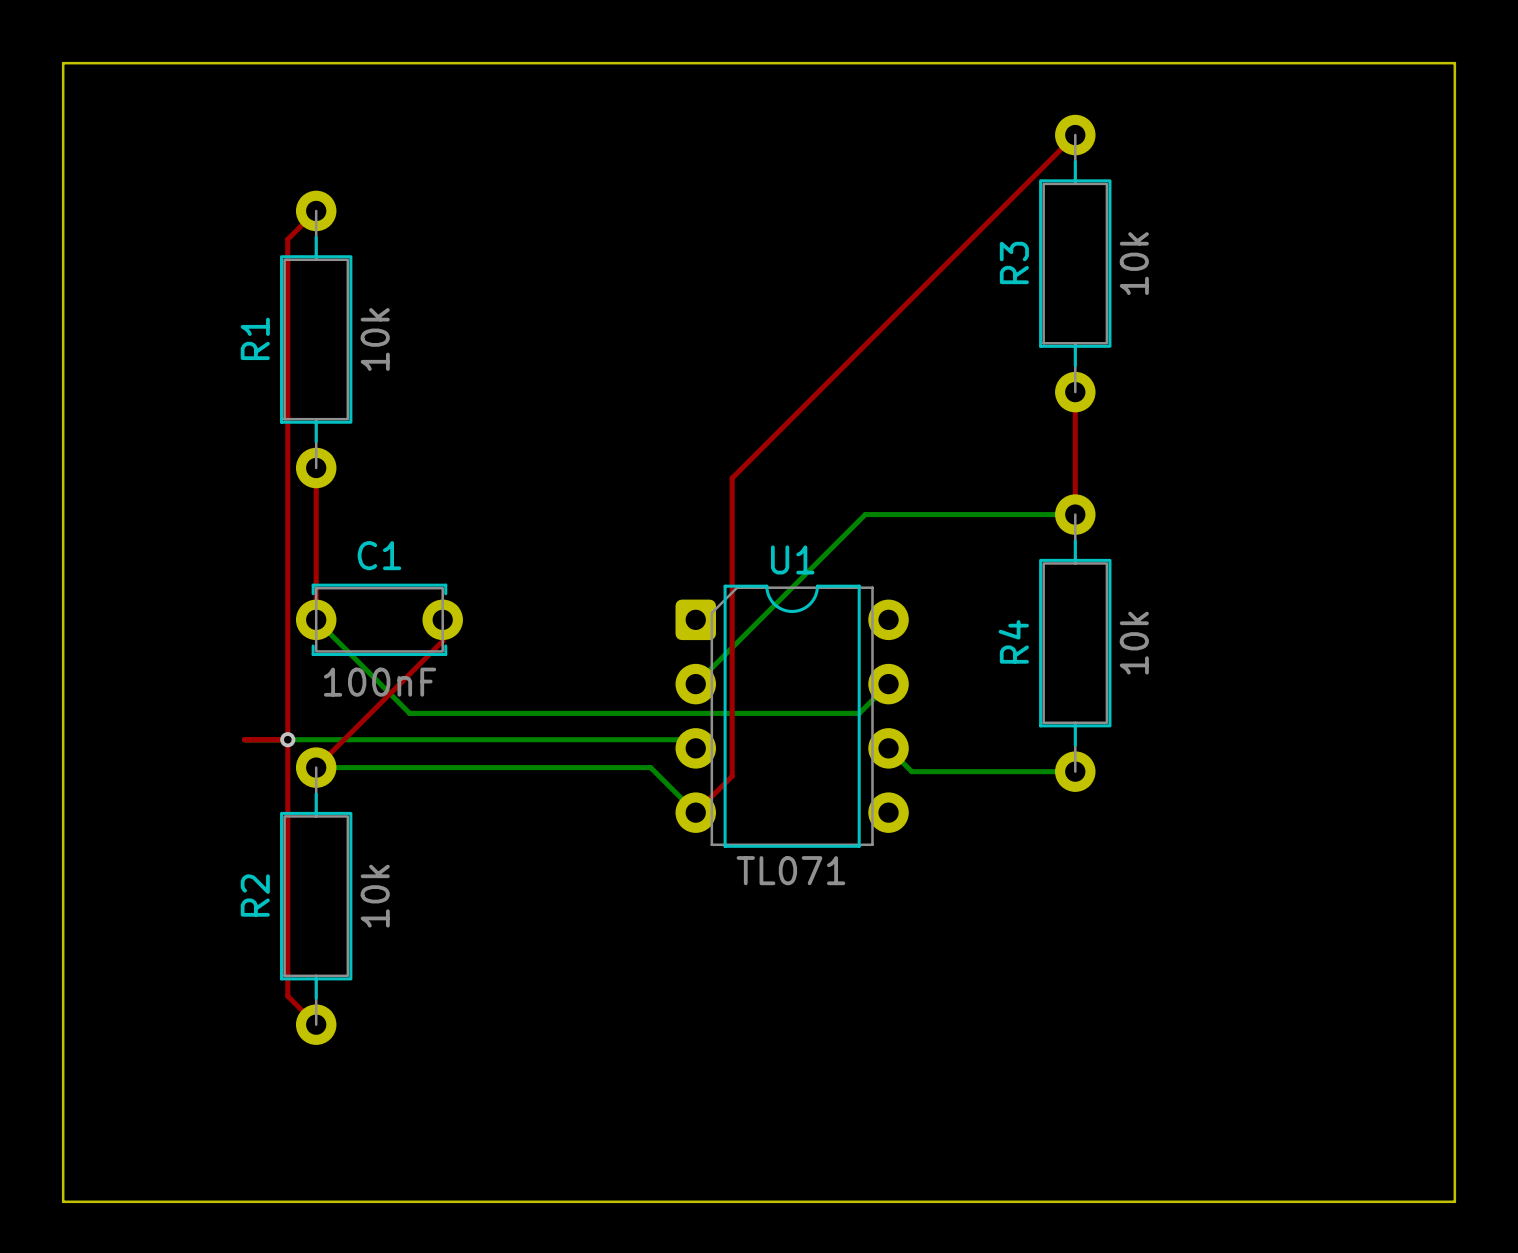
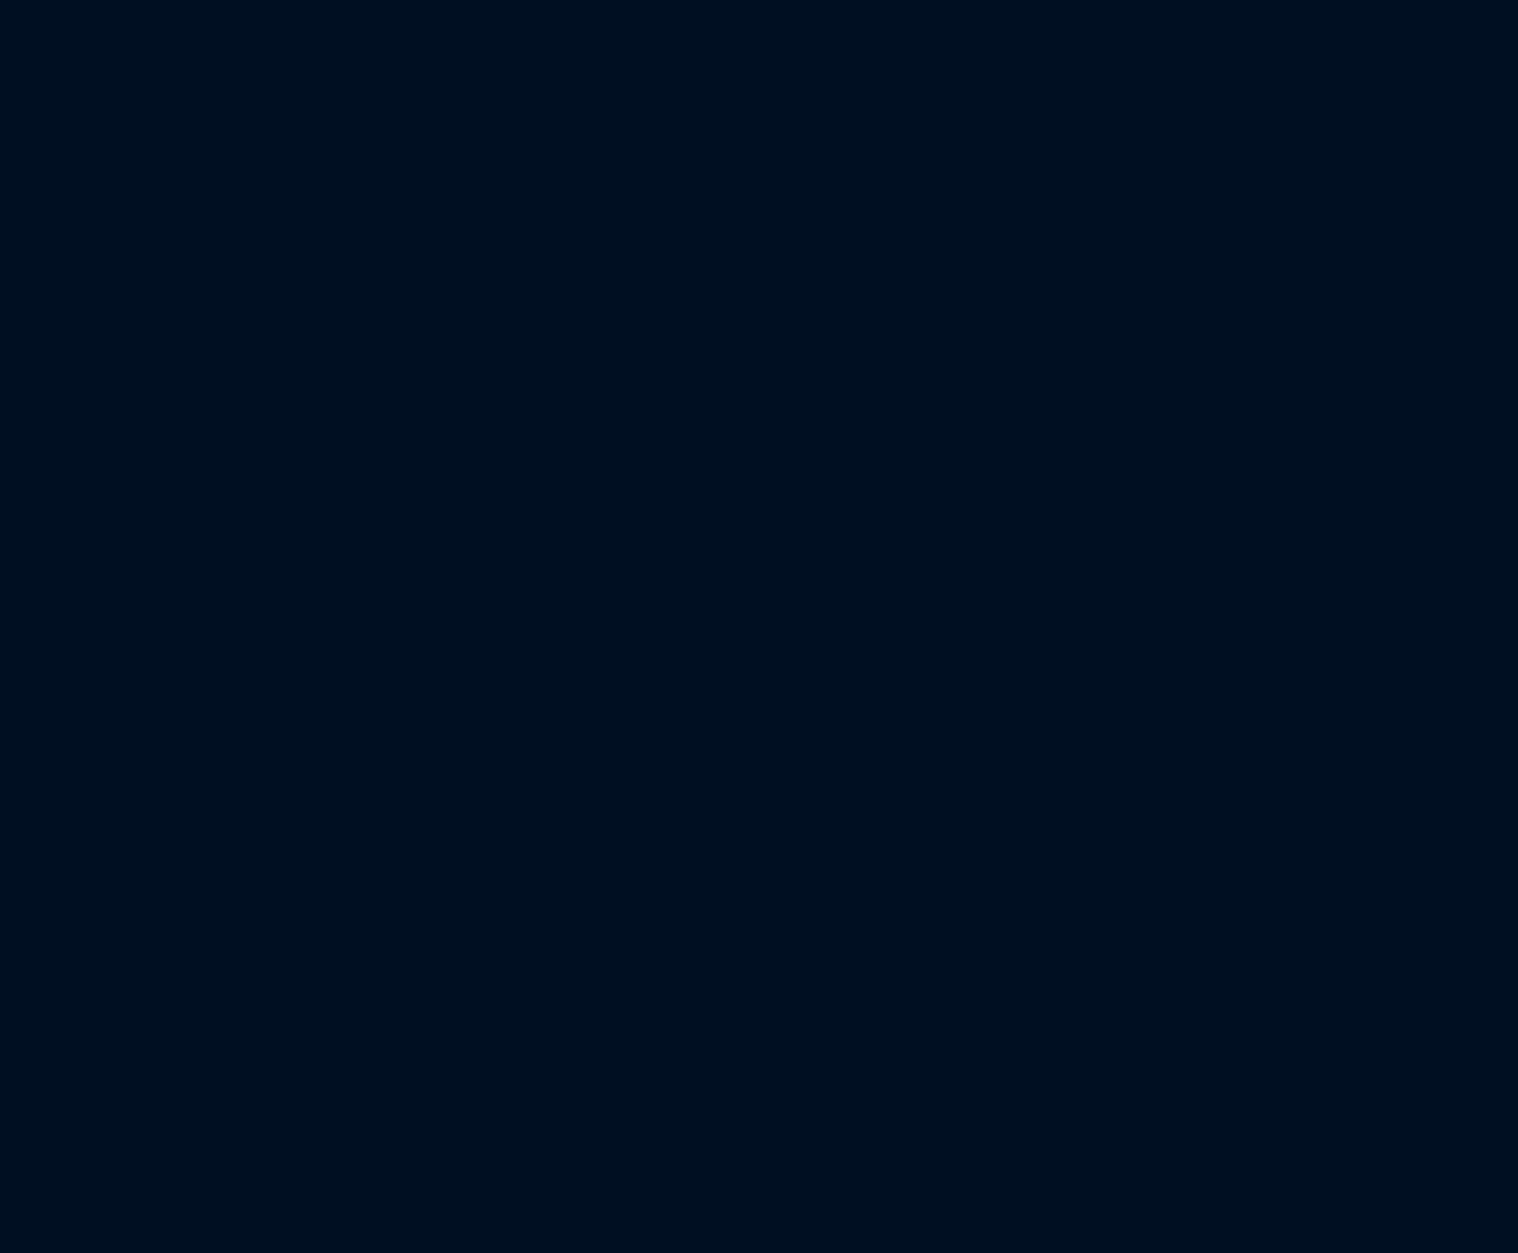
board edge: (63, 63) (1454, 63) (1454, 1201) (63, 1201) (63, 63) -> none
top track: (1075, 135) (732, 478) (732, 776) (695, 812) -> none
top track: (316, 210) (287, 239) (287, 996) (316, 1024) -> none
R3: 10k (1075, 263) -> none
R1: 10k (316, 339) -> none
top track: (1075, 392) (1075, 514) -> none
top track: (316, 468) (316, 619) -> none
bottom track: (1075, 514) (865, 514) (695, 684) -> none
bottom track: (316, 619) (409, 713) (859, 713) (888, 684) -> none
C1: 100nF (379, 619) -> none
top track: (442, 619) (442, 641) (316, 767) -> none
R4: 10k (1075, 643) -> none
U1: TL071 (792, 716) -> none
bottom track: (244, 739) (687, 739) (695, 748) -> none
via: (287, 739) -> none
bottom track: (888, 748) (911, 771) (1075, 771) -> none
bottom track: (316, 767) (650, 767) (695, 812) -> none
R2: 10k (316, 896) -> none

